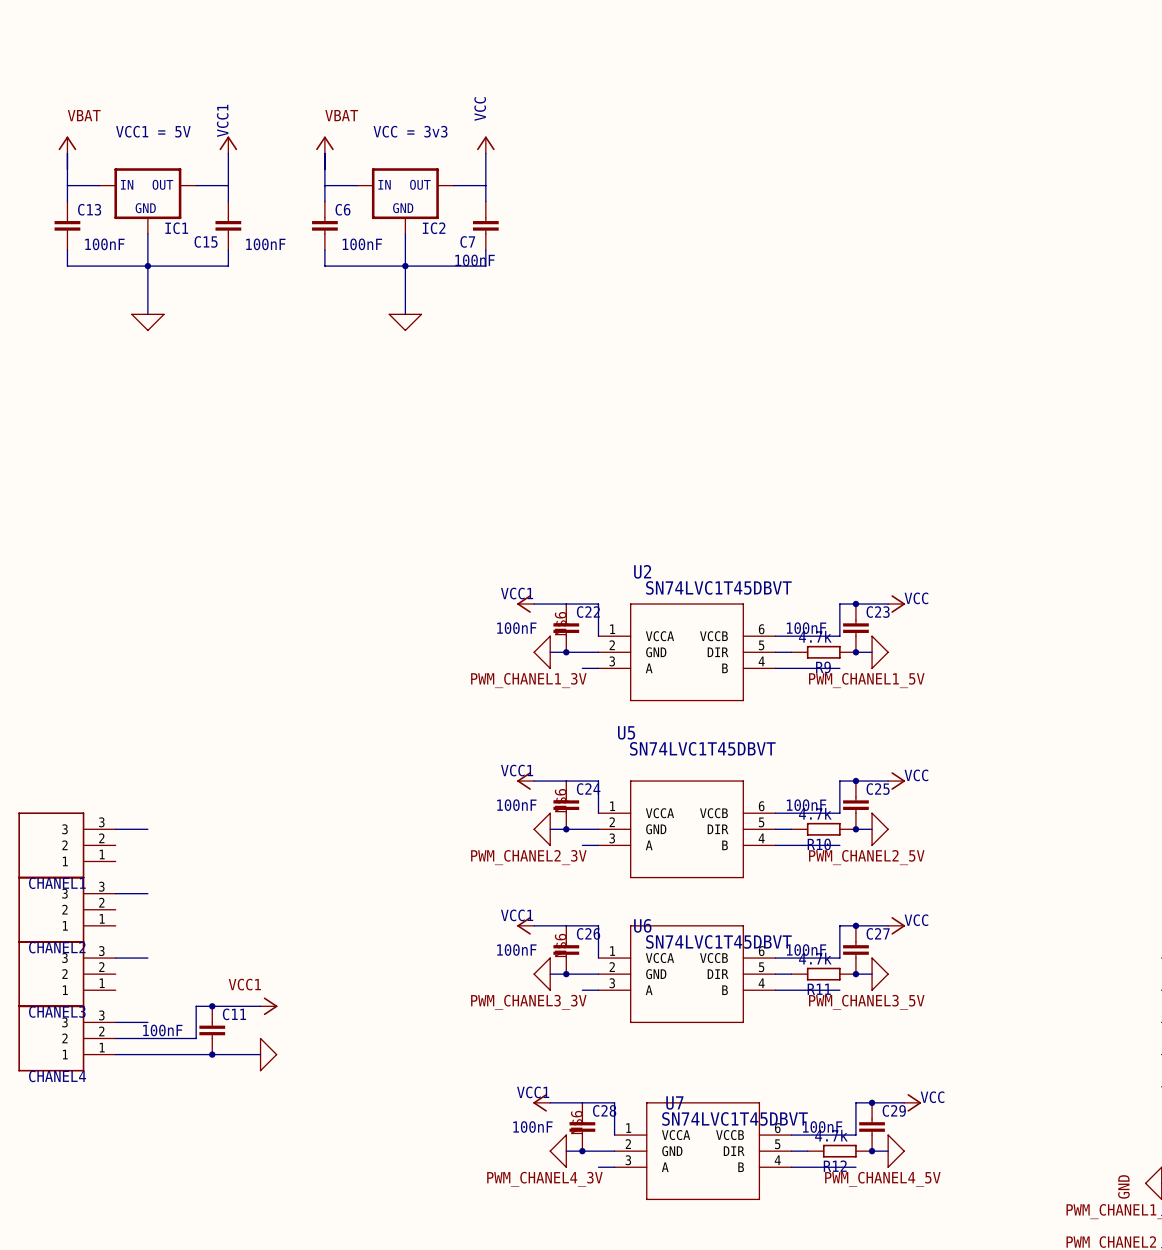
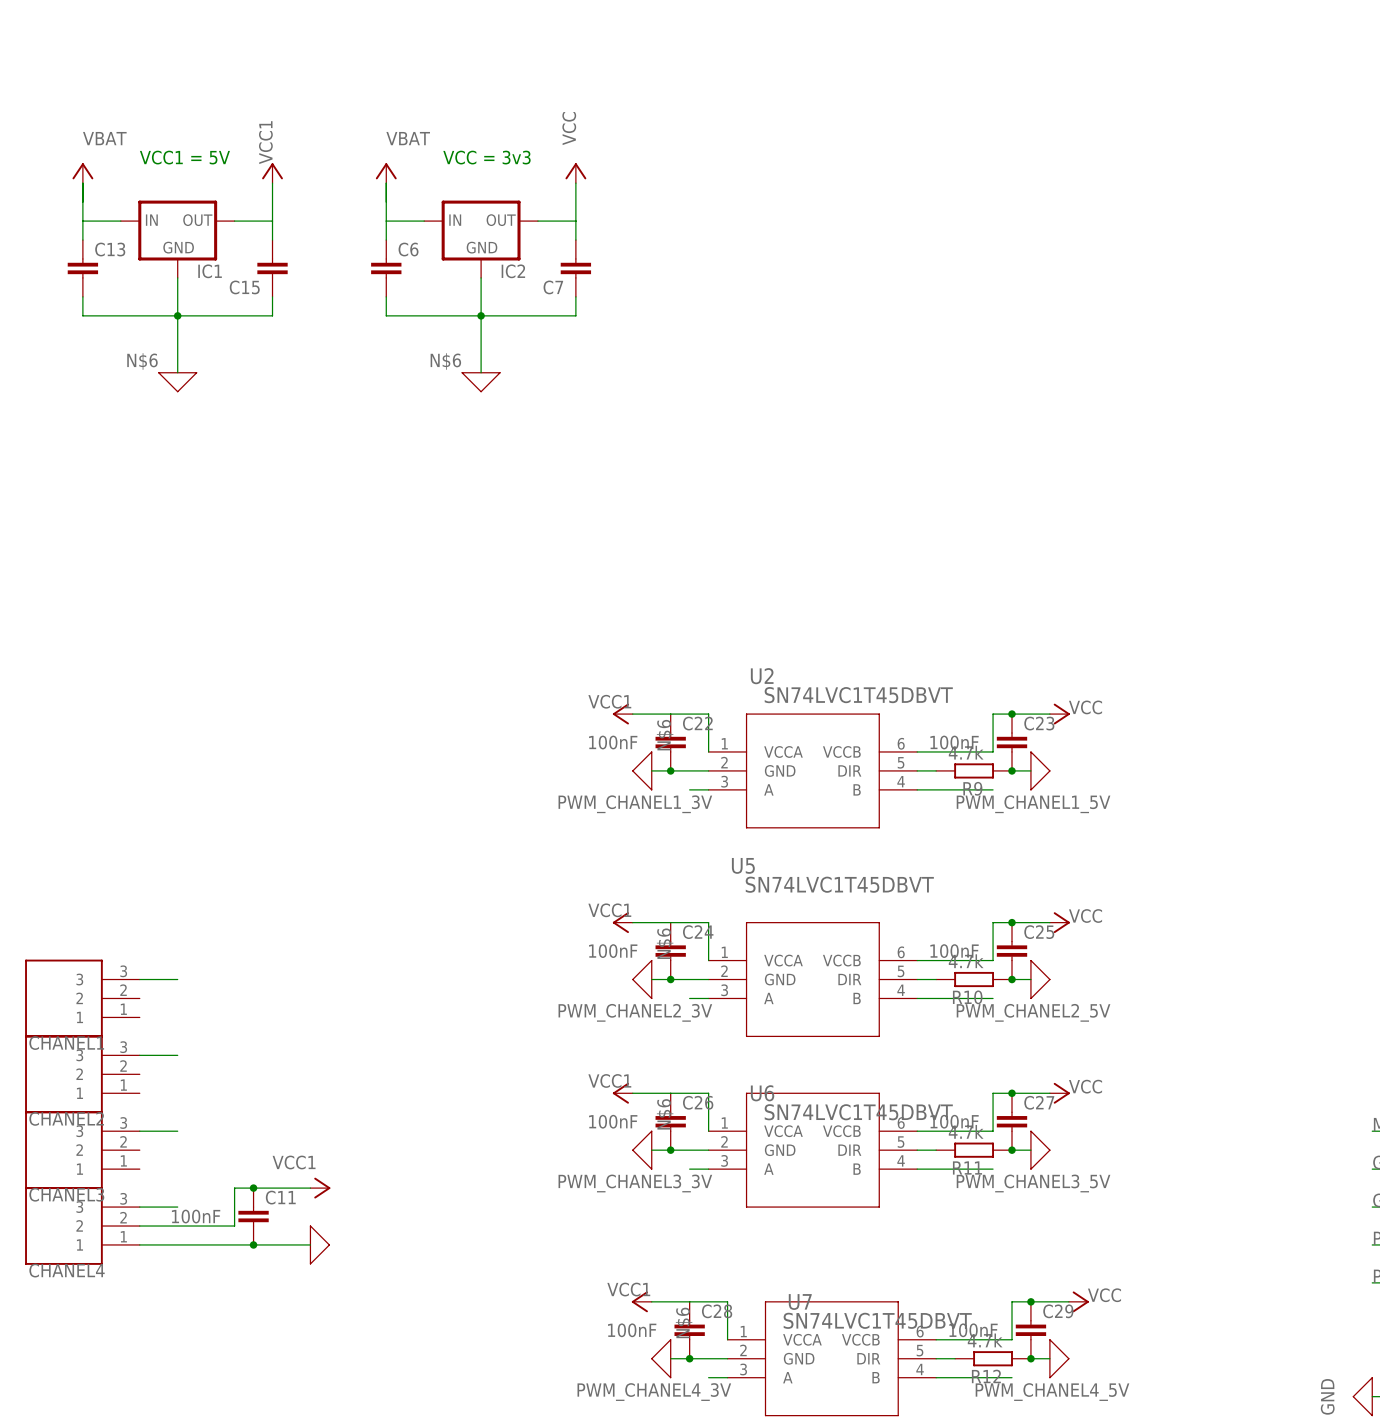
text: 100nF (104, 244) -> none
text: 100nF (265, 244) -> none
text: 100nF (362, 244) -> none
text: 100nF (475, 260) -> none
label: none -> N$6 (142, 361)
label: none -> N$6 (445, 361)

